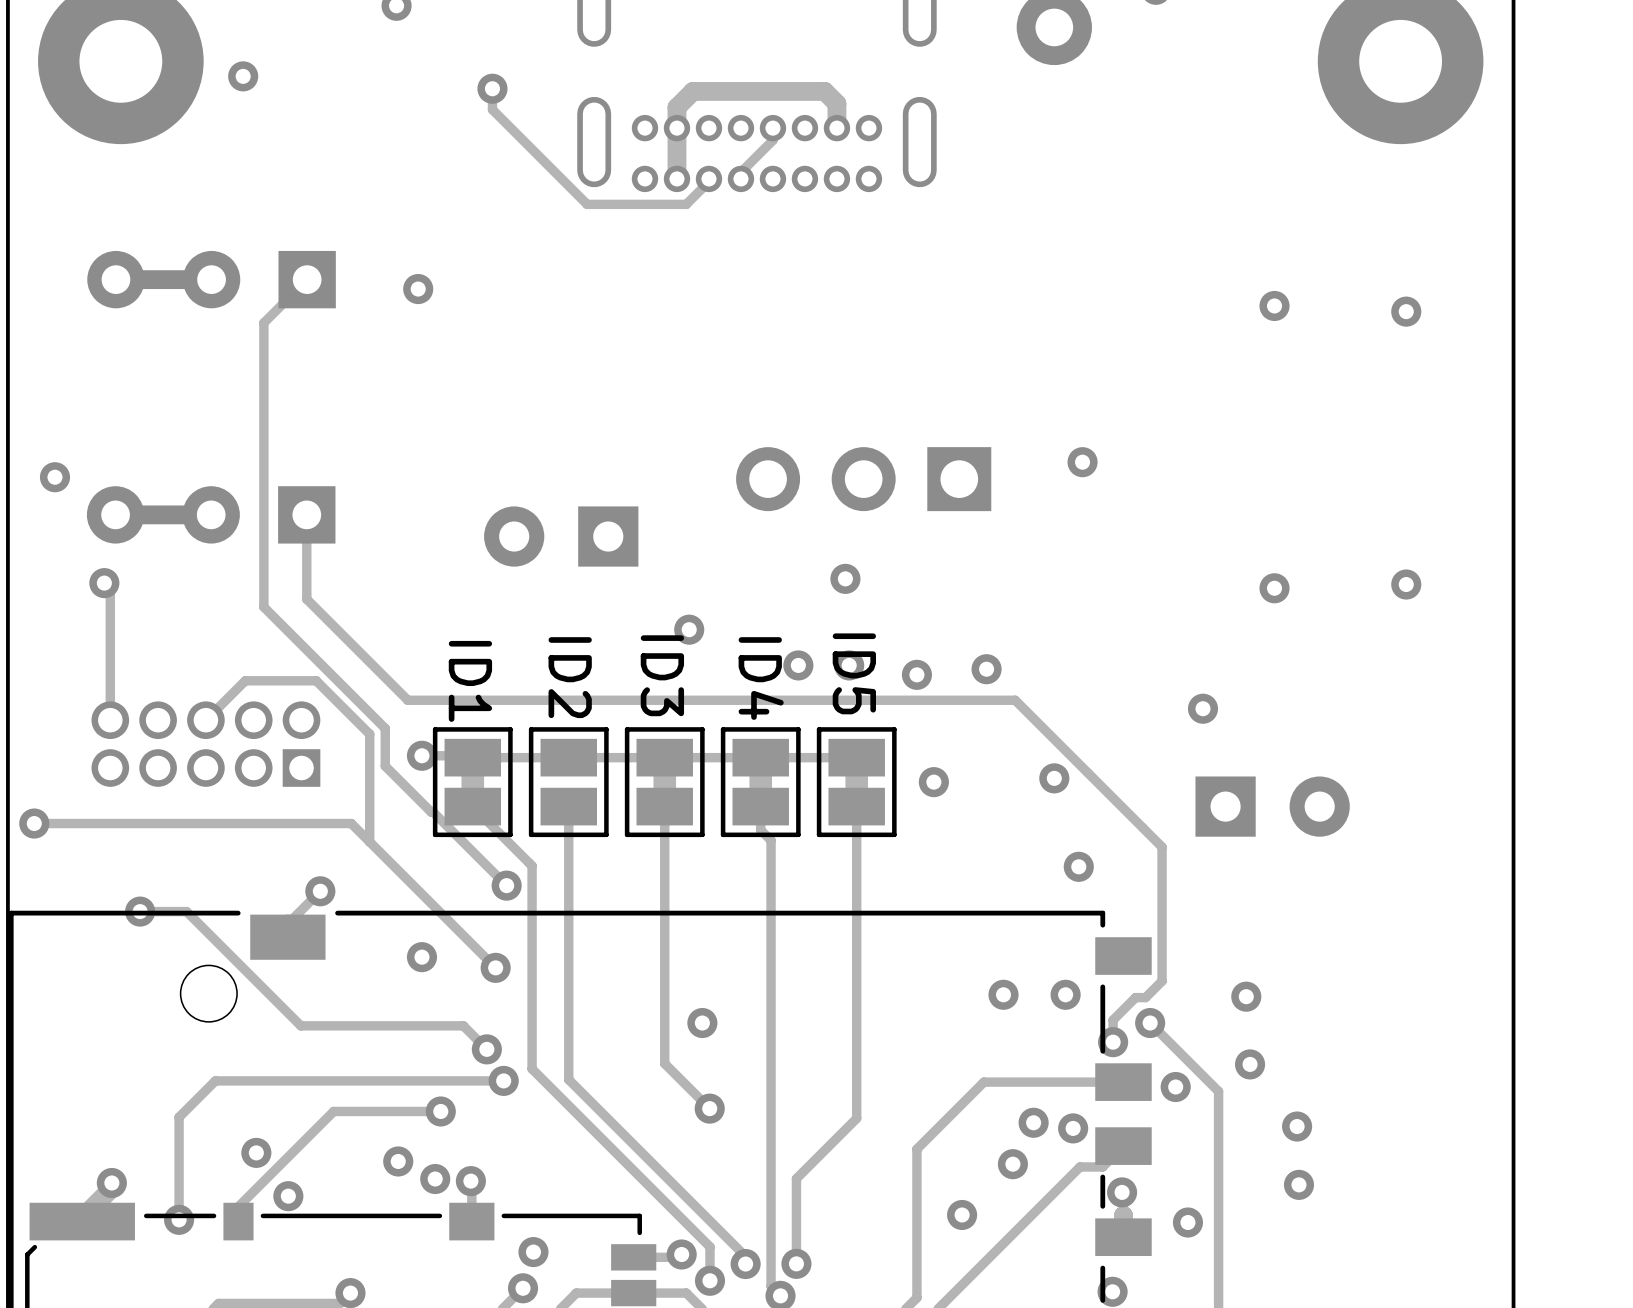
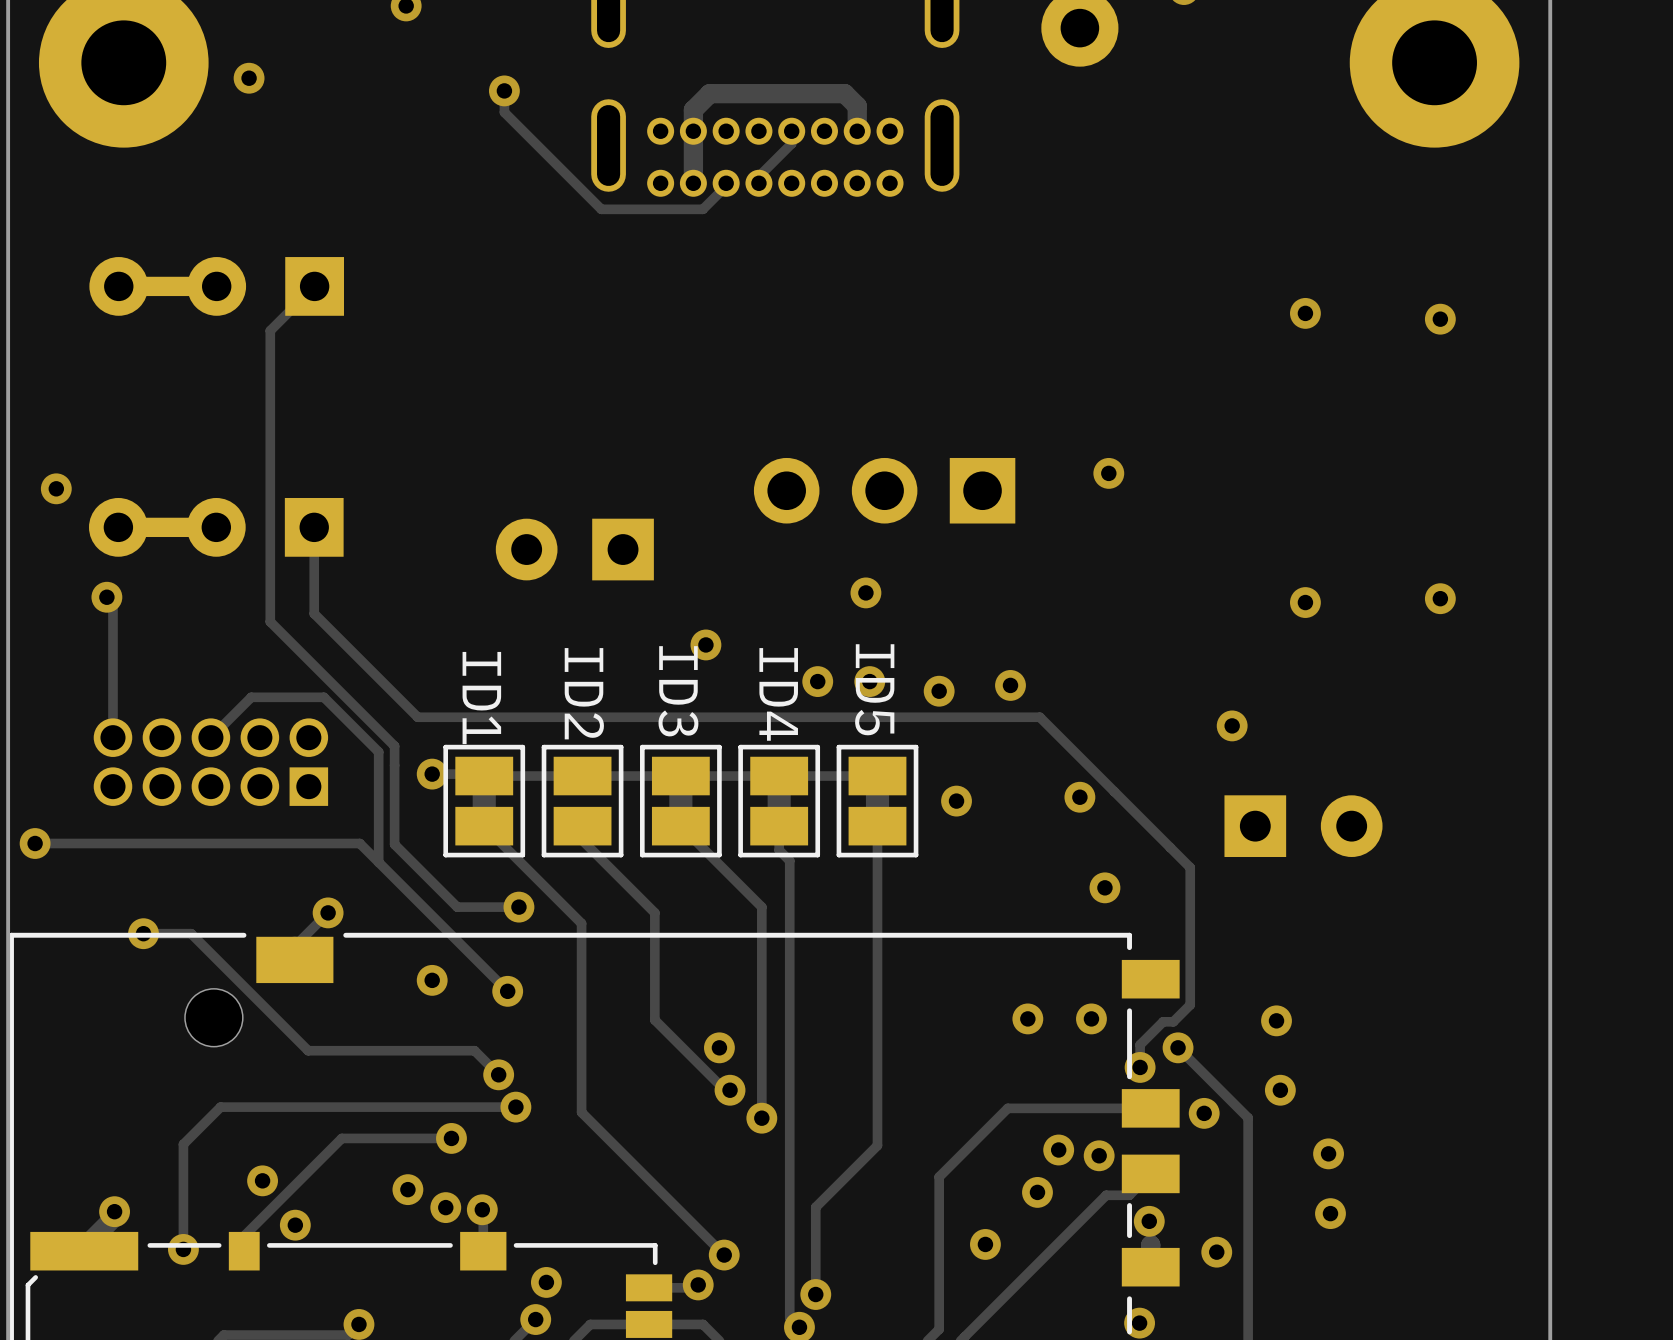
via: (418, 289) -> none
track: (385, 766) (506, 885) -> (394, 784) (394, 844) (457, 907) (518, 907)
track: (664, 806) (664, 1063) (709, 1108) -> (680, 826) (761, 907) (761, 1118)
track: (568, 820) (568, 1079) (745, 1256) (745, 1264) -> (582, 840) (654, 912) (654, 1020) (725, 1090) (730, 1090)
track: (532, 865) (532, 1068) (709, 1246) (709, 1280) -> (544, 886) (581, 923) (581, 1112) (724, 1255)
via: none -> (730, 1090)
via: none -> (761, 1118)
via: (709, 1108) -> none
via: none -> (724, 1255)
via: (745, 1264) -> none
via: (709, 1280) -> none

